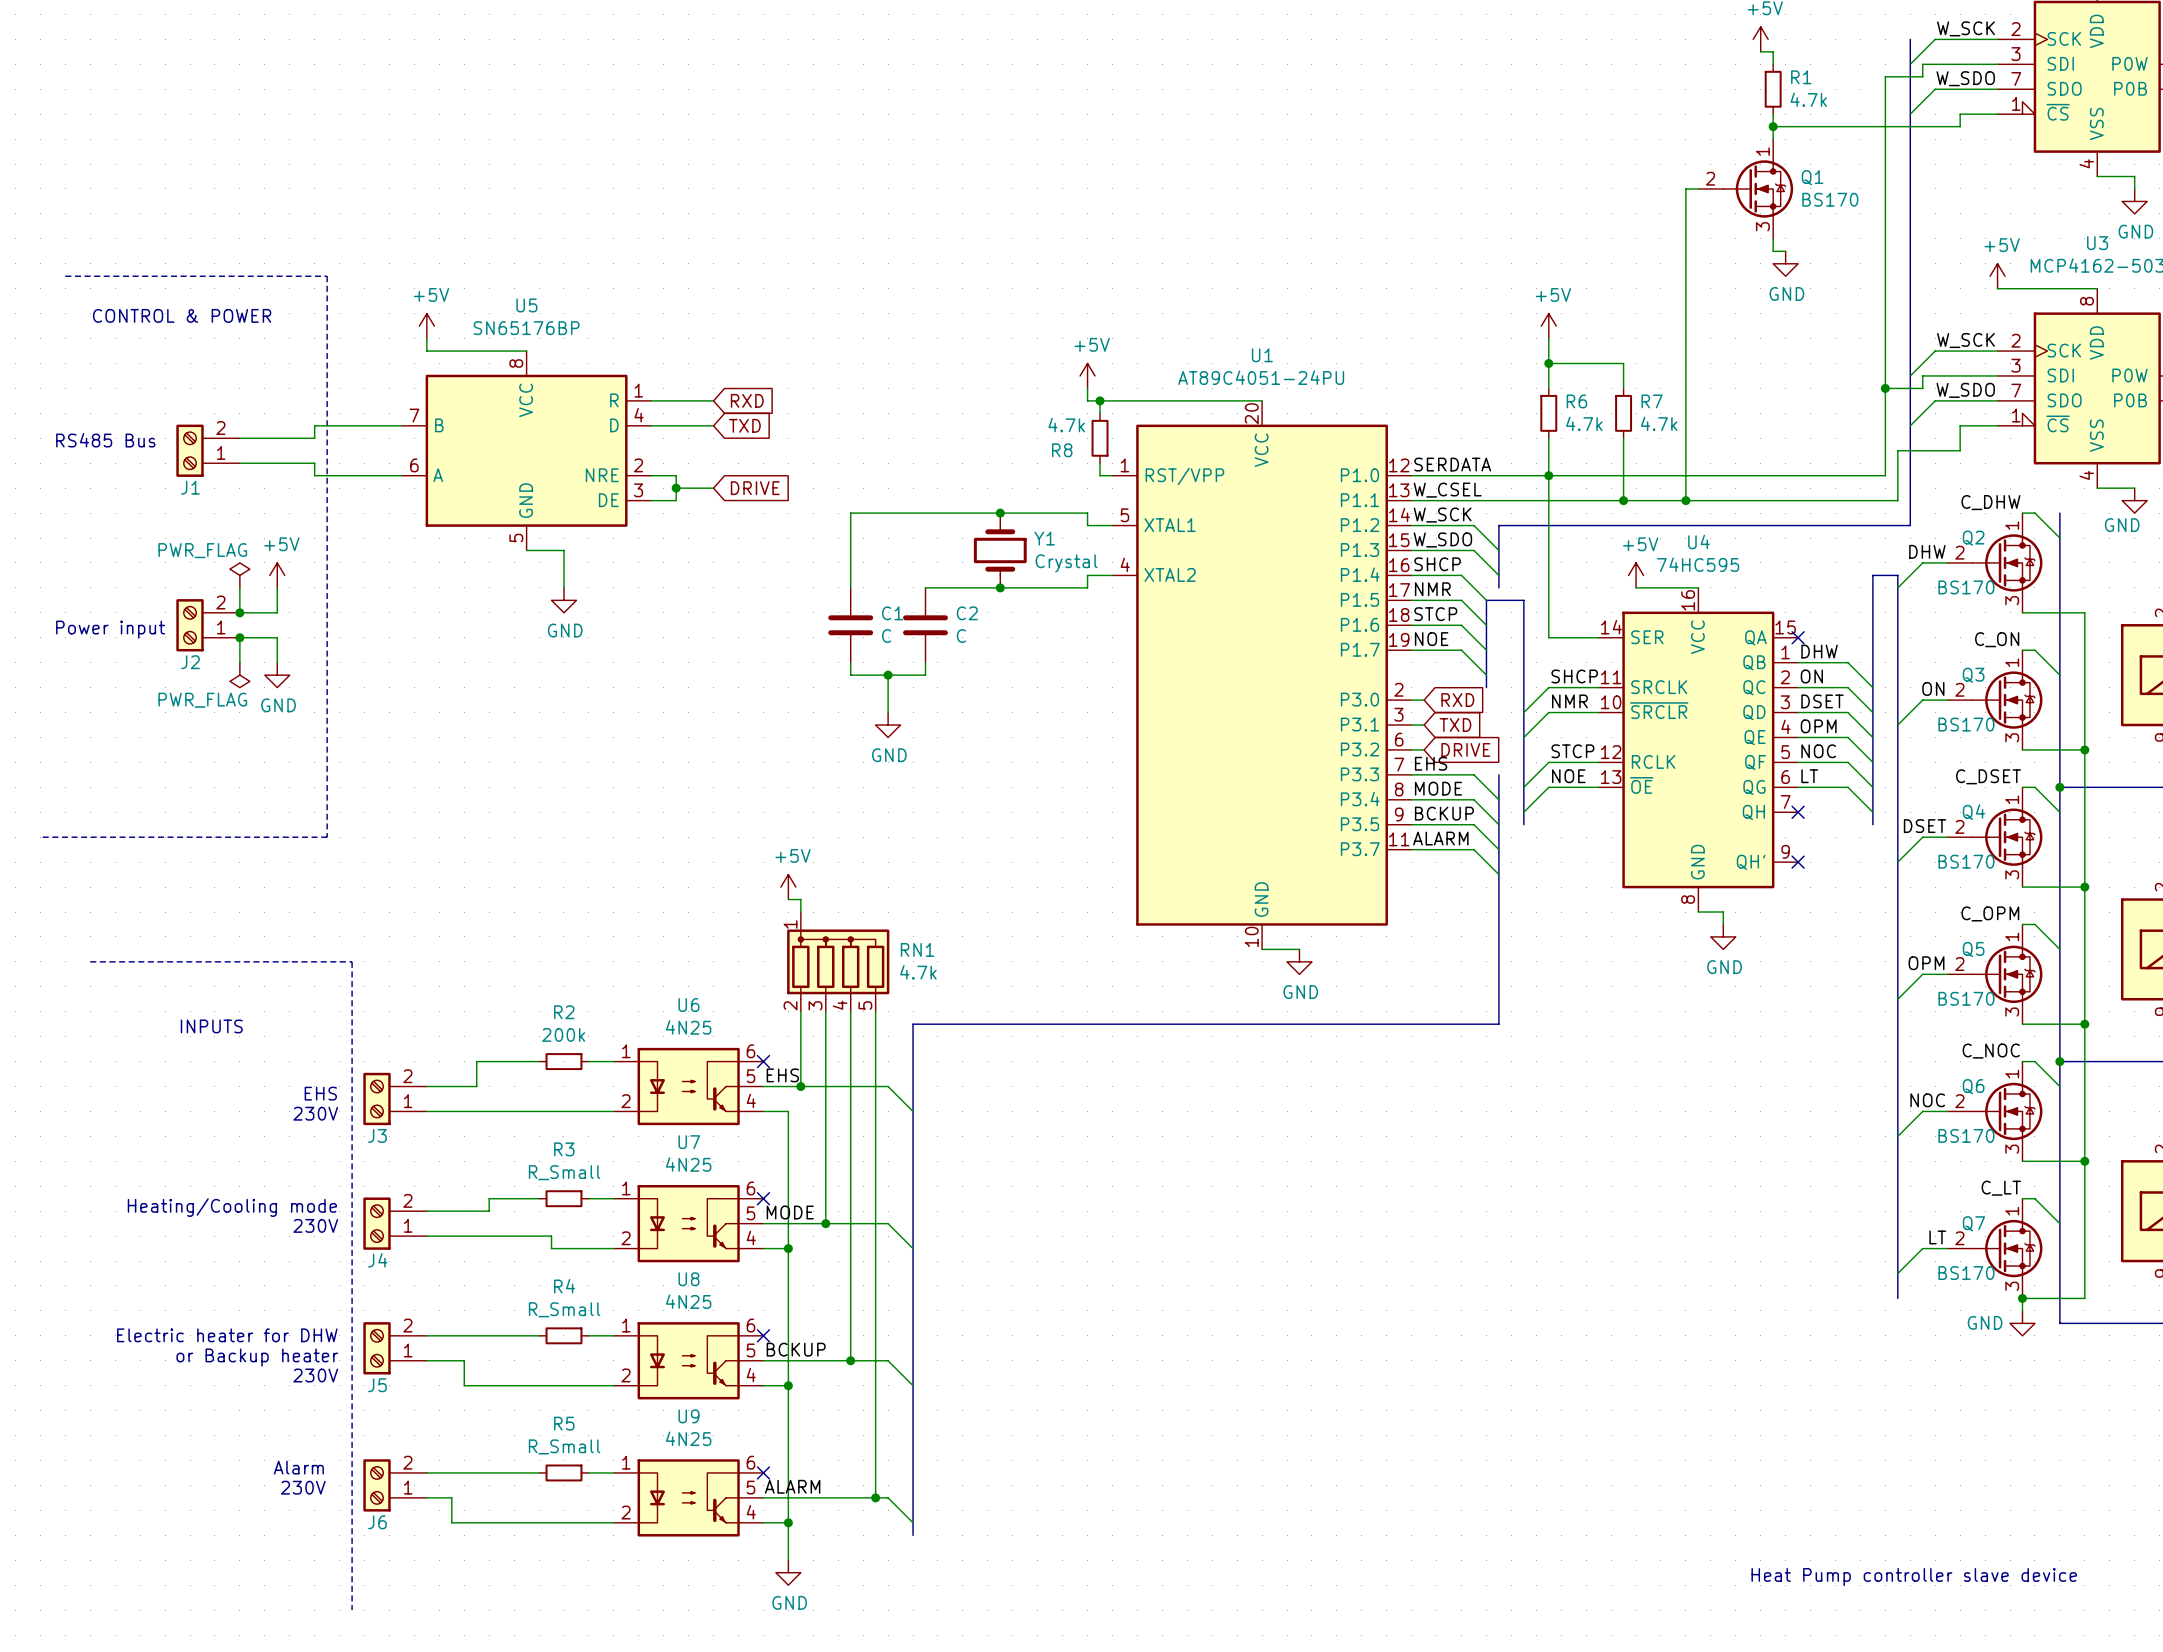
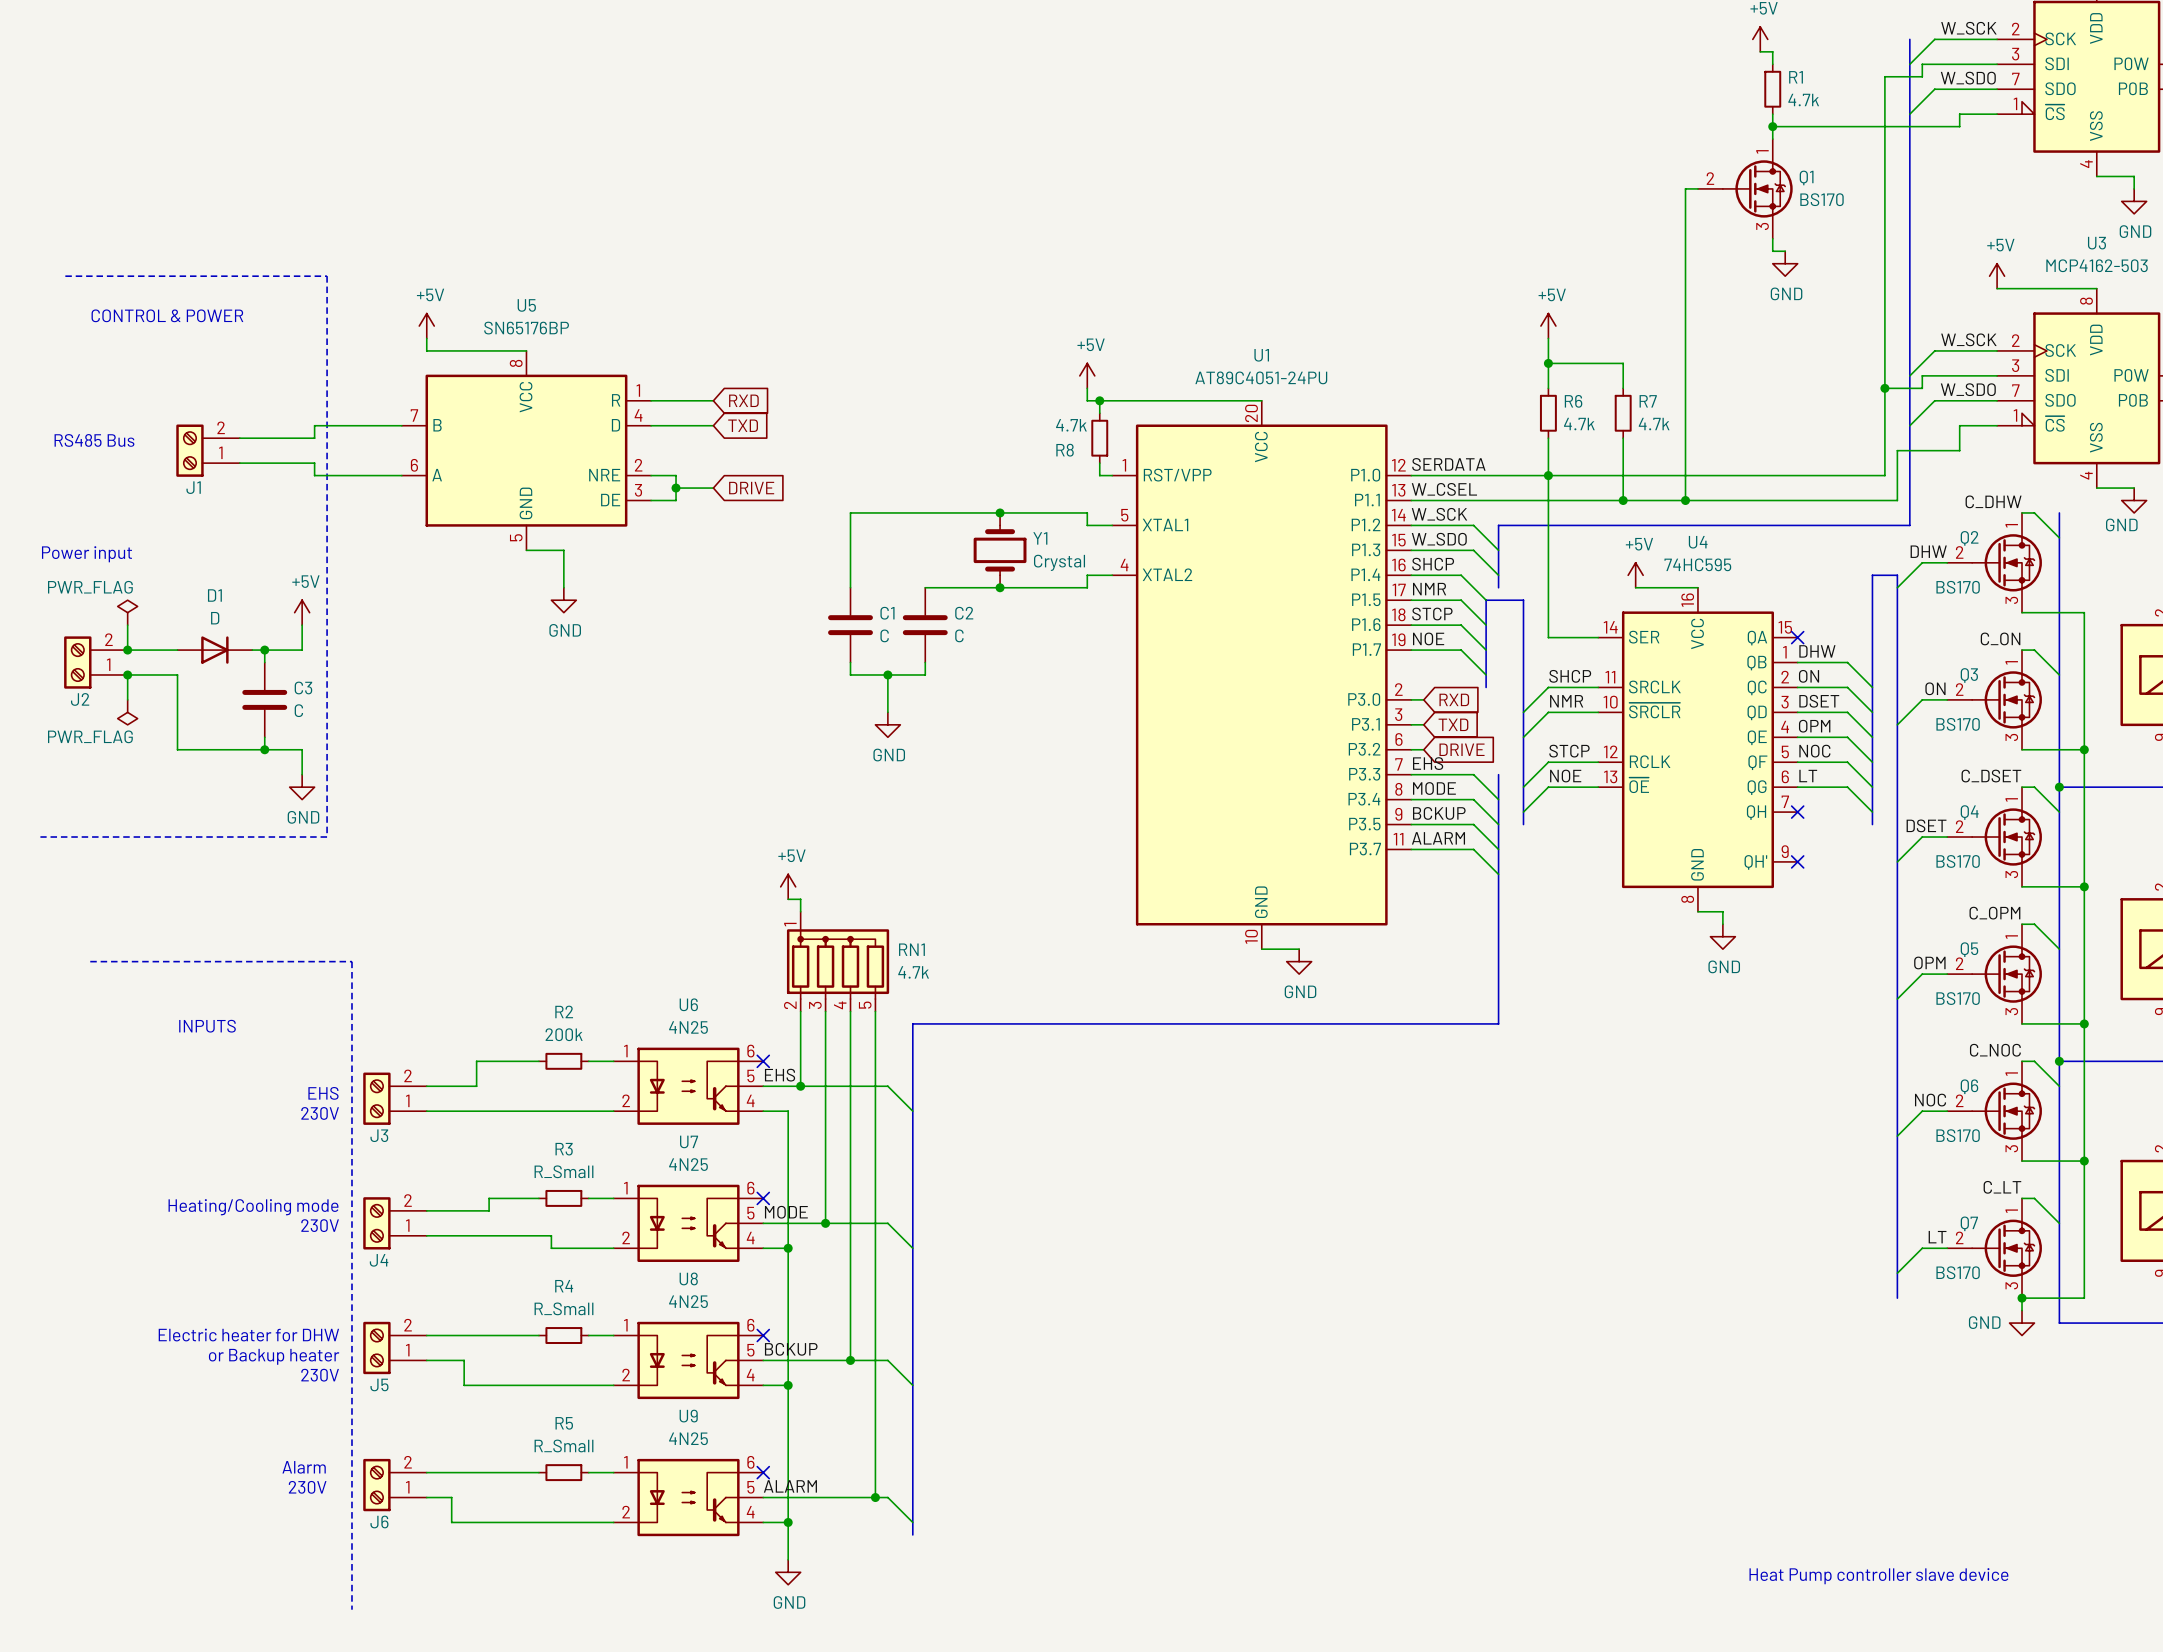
power symbol: PWR_FLAG (239, 575) -> none
power symbol position: +5V (277, 575) -> +5V (302, 612)
wire: (239, 587) (239, 612) (277, 612) (277, 587) -> none
power symbol: none -> PWR_FLAG (127, 612)
junction: (239, 612) -> none
wire: none -> (127, 625) (127, 650) (177, 650)
J2 position: (208, 625) -> (95, 662)
wire: none -> (302, 625) (302, 650) (252, 650)
text position: Power input (110, 629) -> Power input (86, 554)
junction: (239, 637) -> none
junction: none -> (127, 650)
D1: none -> D (214, 650)
wire: none -> (264, 650) (264, 662)
junction: none -> (264, 650)
wire: (239, 662) (239, 637) (277, 637) (277, 662) -> none
junction: none -> (127, 674)
power symbol: PWR_FLAG (239, 675) -> none
power symbol position: GND (277, 675) -> GND (302, 787)
wire: none -> (127, 699) (127, 674) (177, 674) (177, 749) (302, 749) (302, 774)
C3: none -> C (264, 699)
power symbol: none -> PWR_FLAG (127, 712)
wire: none -> (264, 737) (264, 749)
junction: none -> (264, 749)

